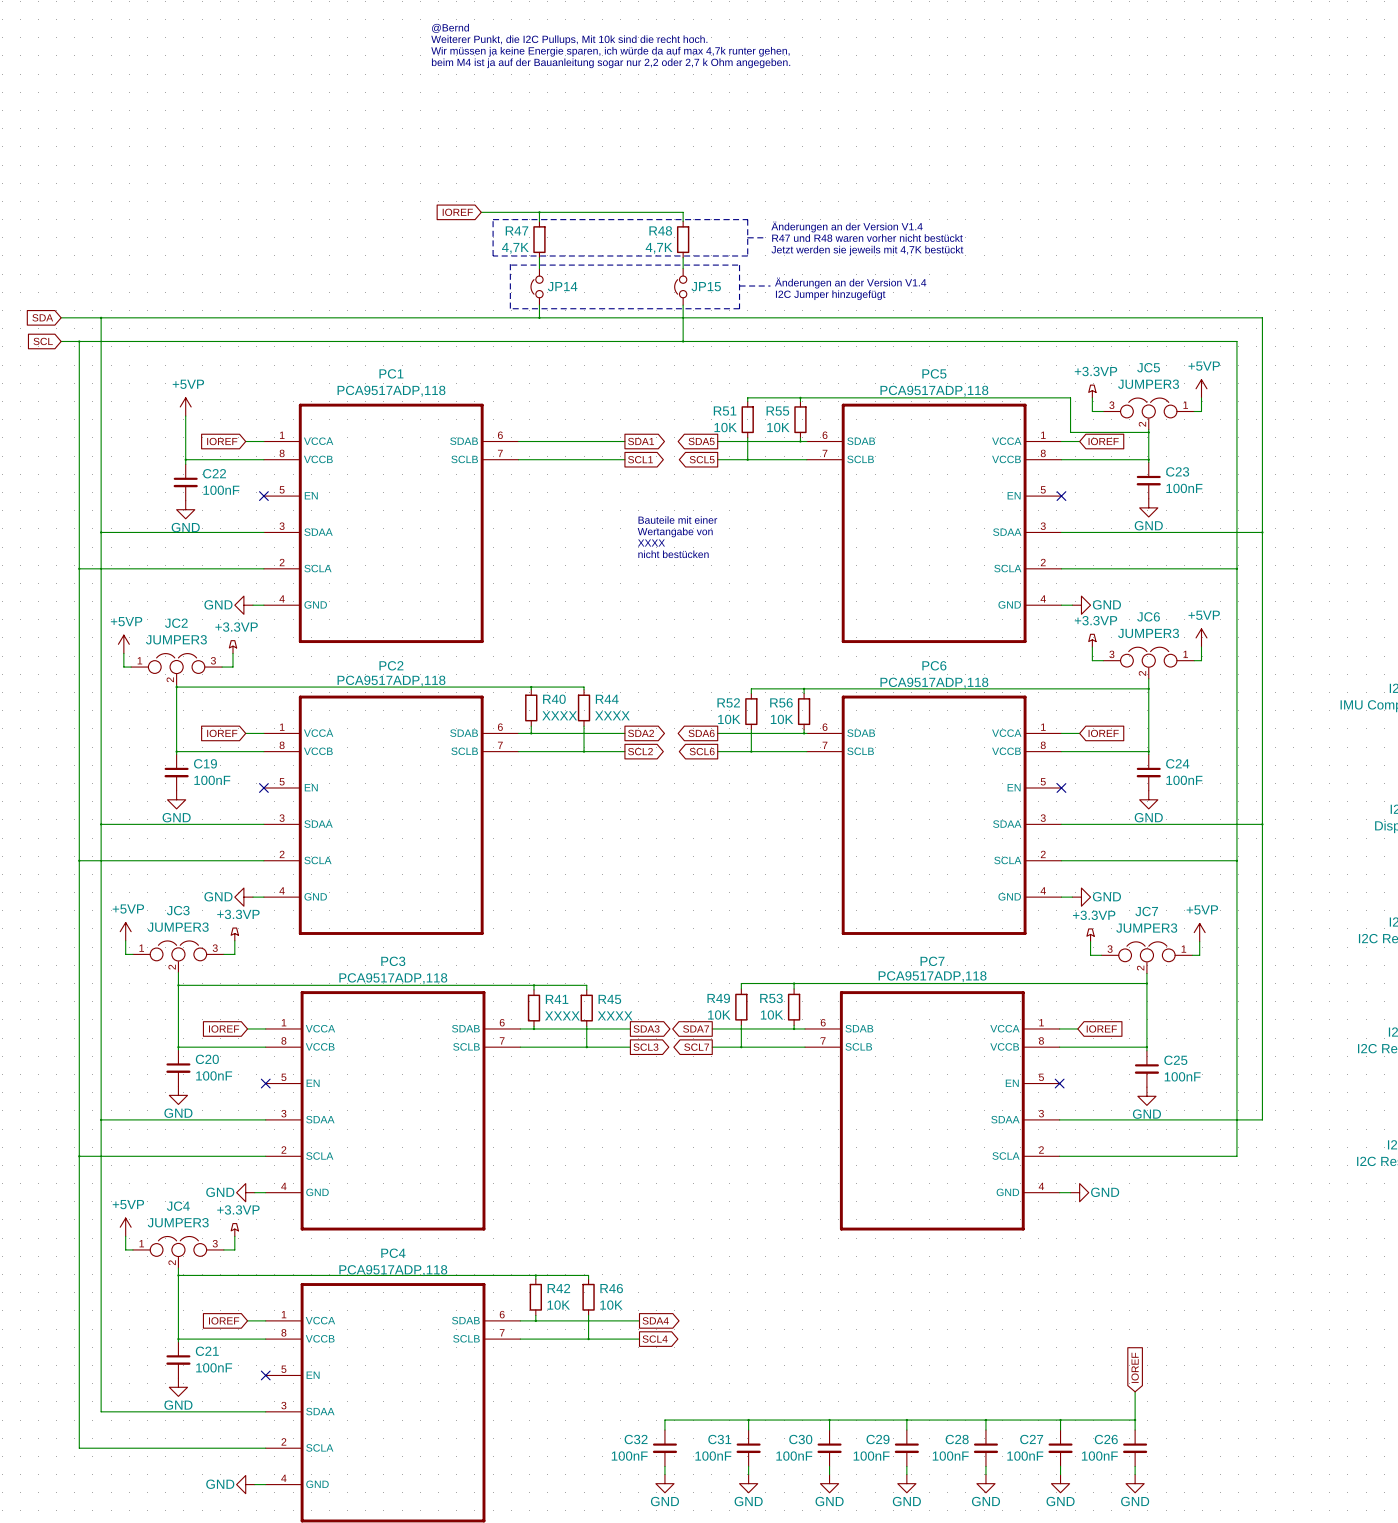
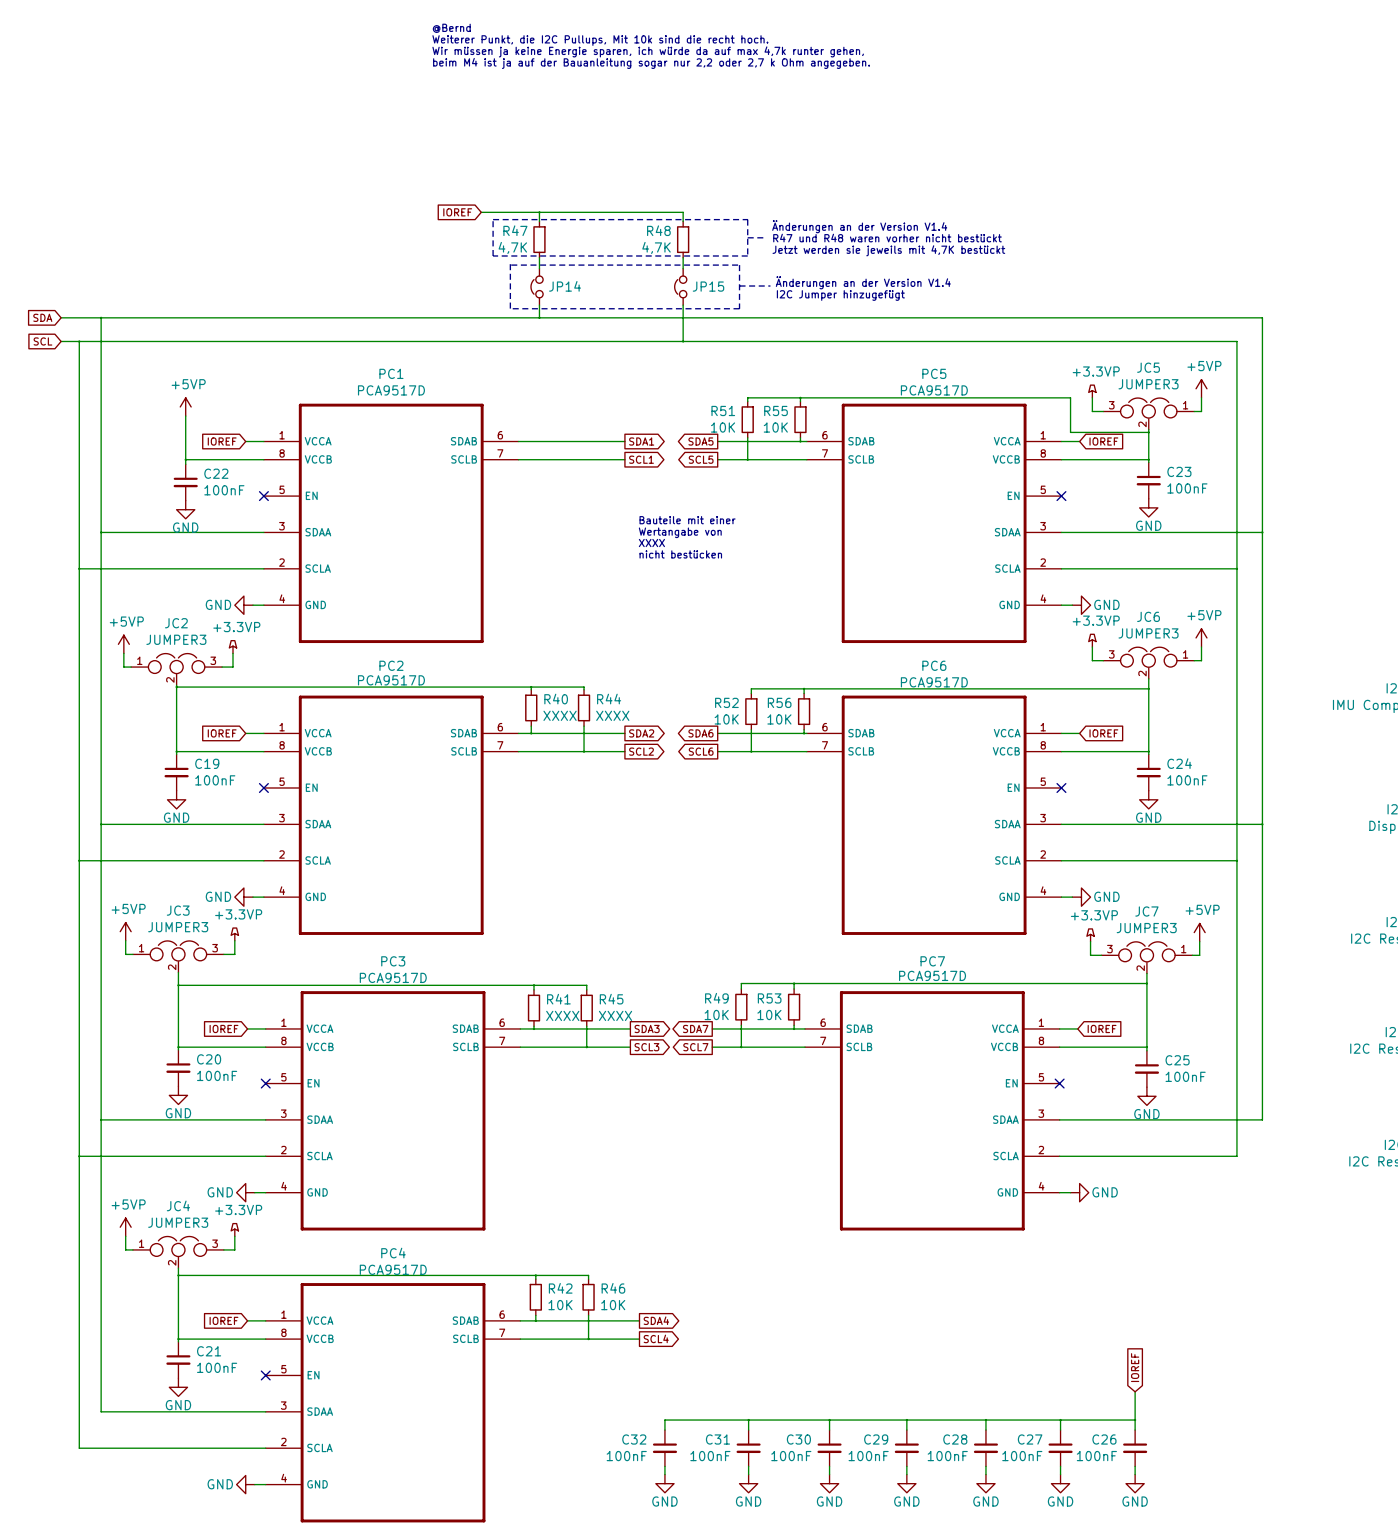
PC1 value: PCA9517ADP,118 (391, 391) -> PCA9517D (391, 390)
PC5 value: PCA9517ADP,118 (934, 391) -> PCA9517D (934, 390)
PC2 value: PCA9517ADP,118 (391, 681) -> PCA9517D (391, 680)
PC6 value: PCA9517ADP,118 (934, 683) -> PCA9517D (934, 682)
PC7 value: PCA9517ADP,118 (932, 976) -> PCA9517D (932, 975)
PC3 value: PCA9517ADP,118 (393, 978) -> PCA9517D (393, 977)
PC4 value: PCA9517ADP,118 (393, 1270) -> PCA9517D (393, 1269)

